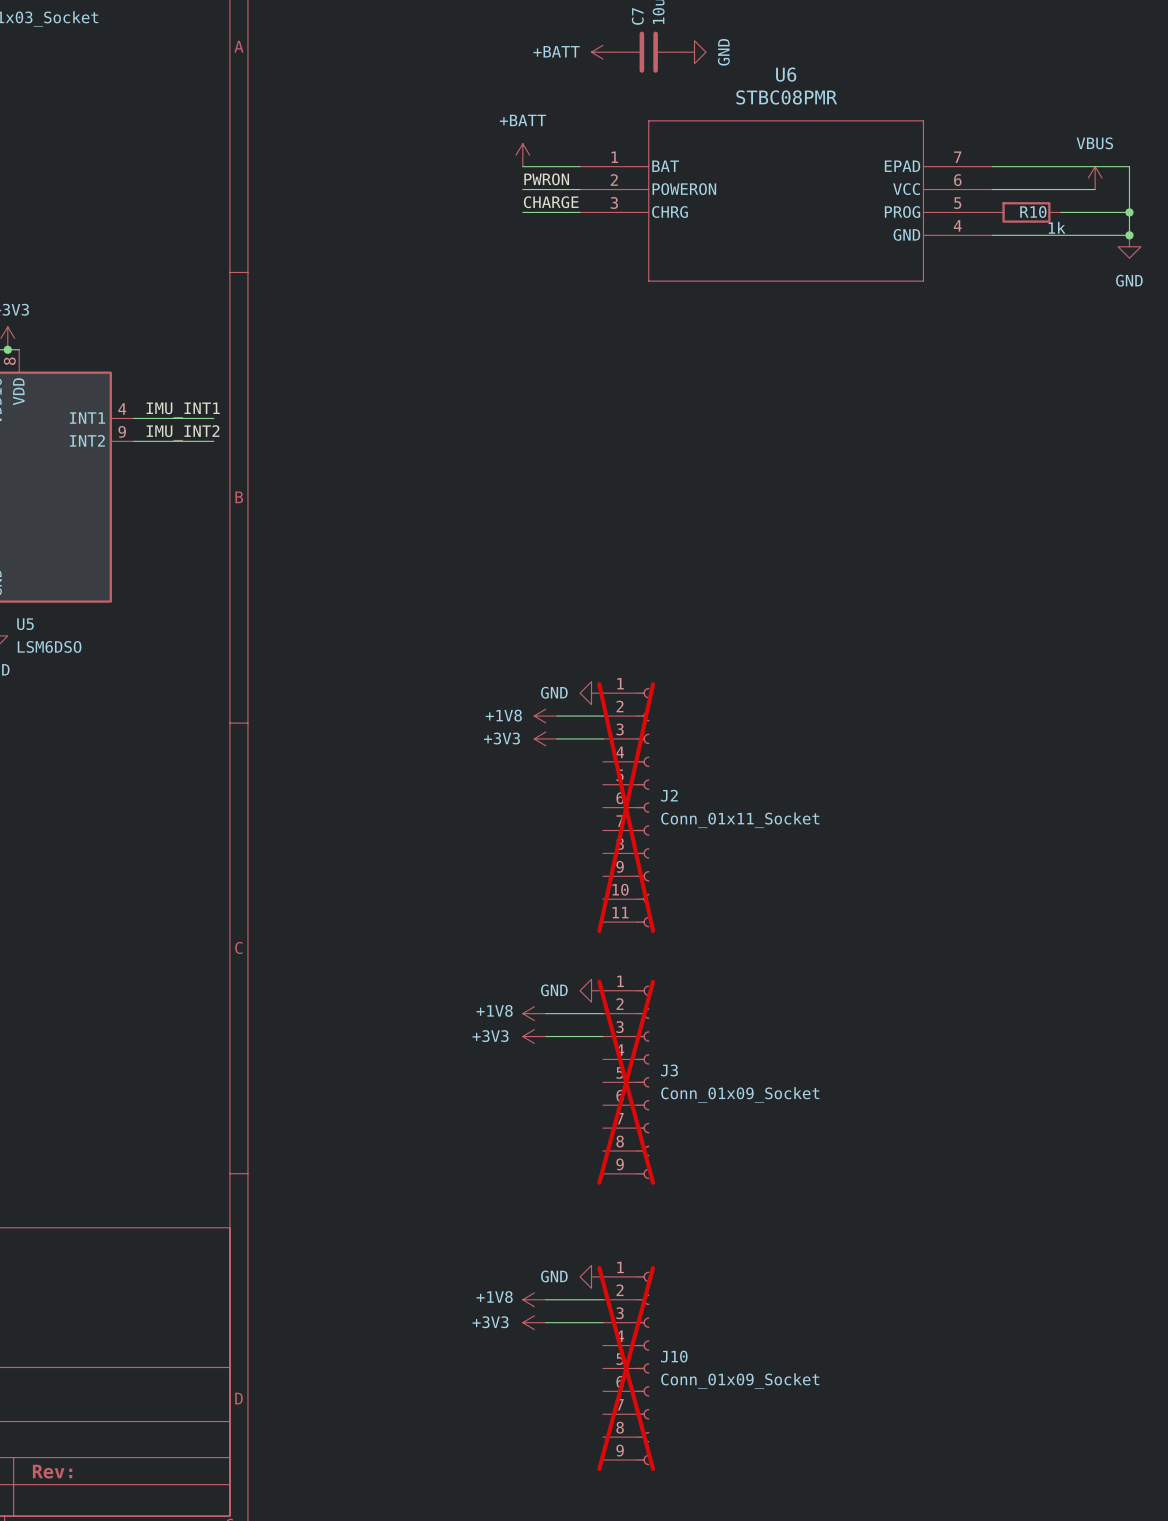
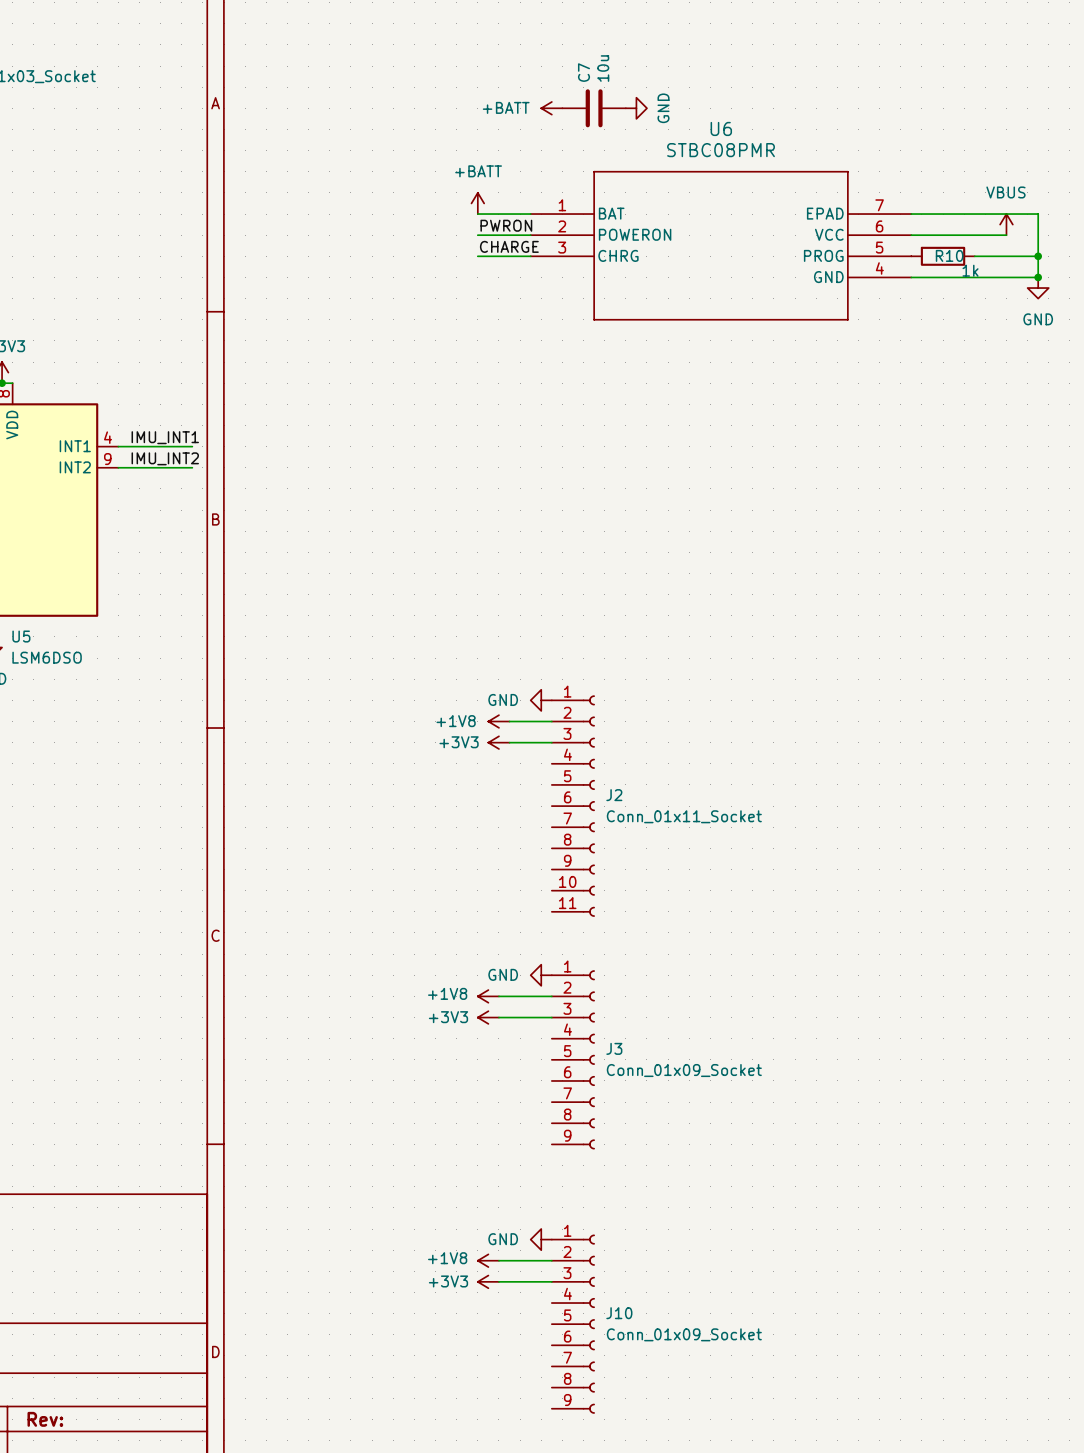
J2 do-not-place cross: (626, 807) -> none
J3 do-not-place cross: (626, 1082) -> none
J10 do-not-place cross: (626, 1368) -> none

